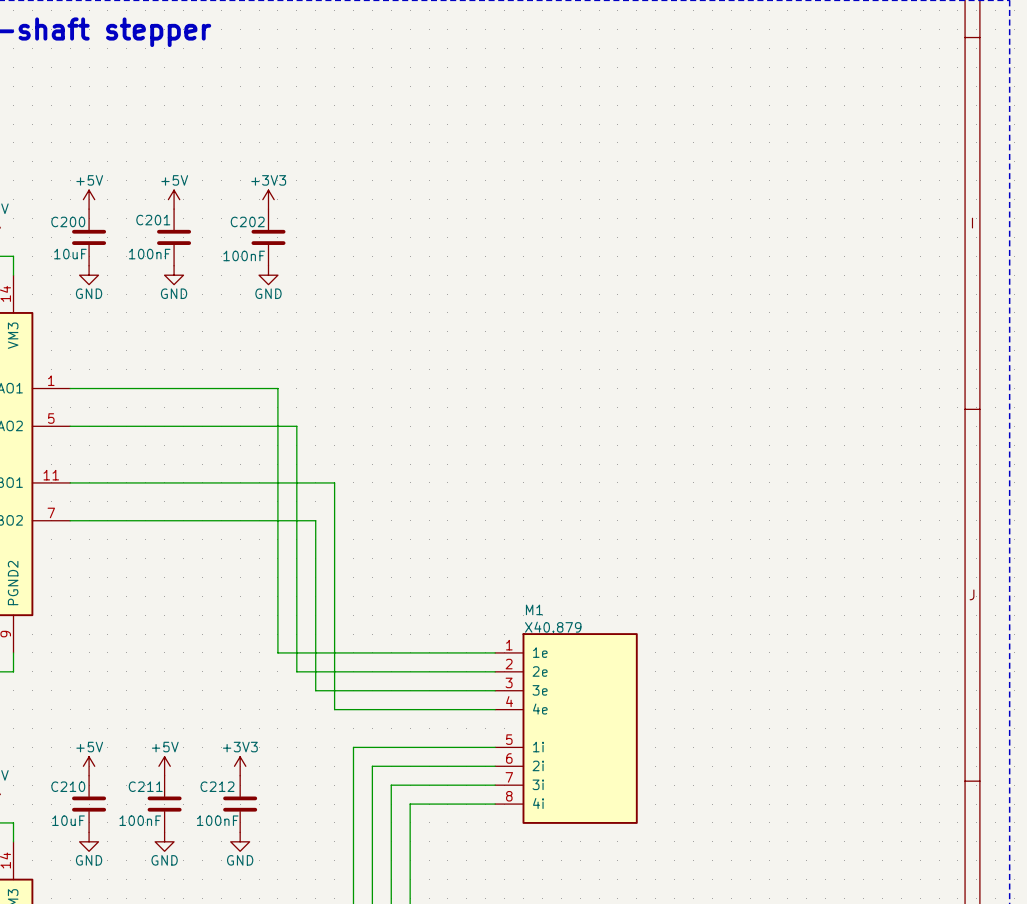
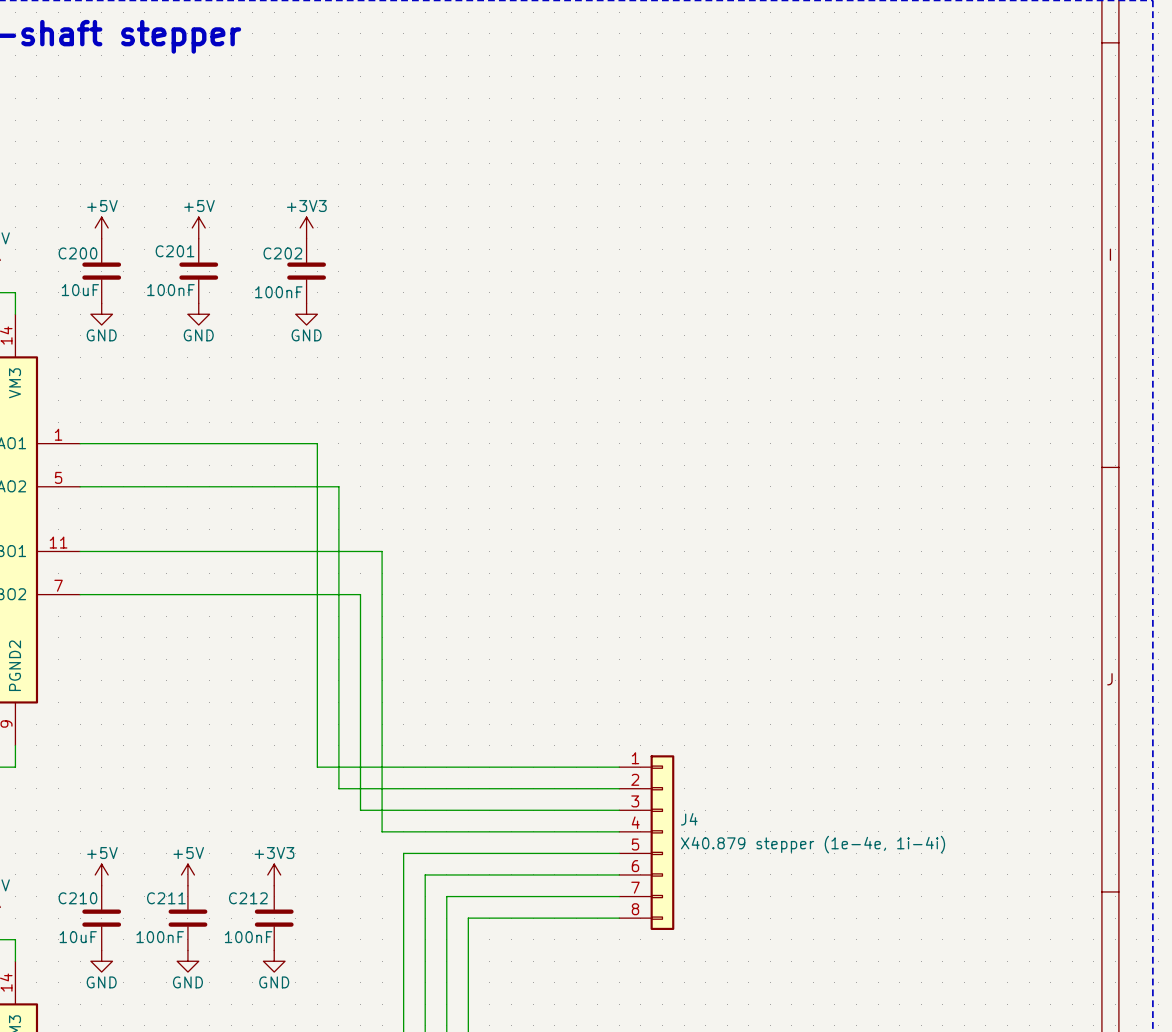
wire: (277, 652) (495, 652) -> (317, 745) (317, 767) (338, 767) (338, 788) (360, 788) (360, 810) (382, 810) (382, 831) (619, 831)
M1: X40.879 (566, 728) -> none
J4: none -> X40.879 stepper (1e-4e, 1i-4i) (646, 842)

